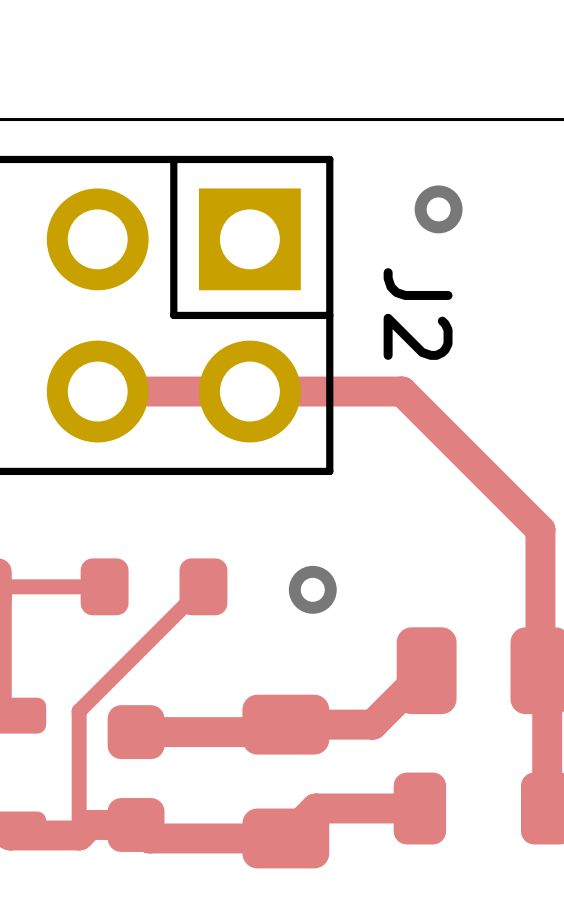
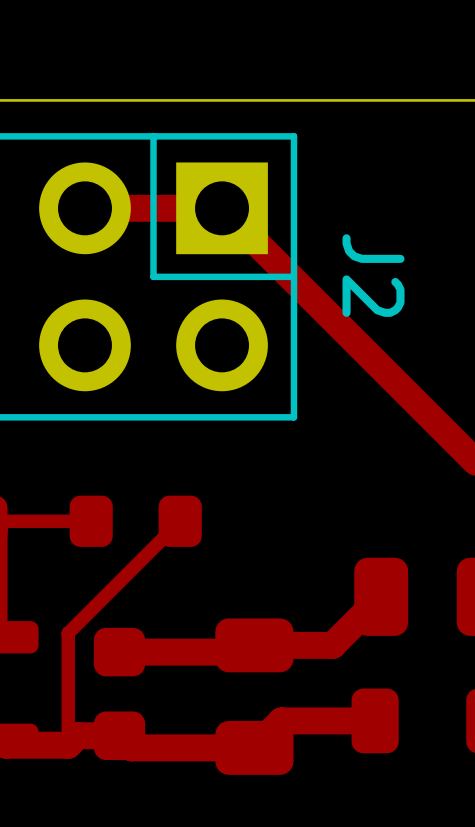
via: (438, 209) -> none
top track: (402, 391) (97, 391) -> (359, 345) (222, 208) (84, 208)
via: (312, 589) -> none

